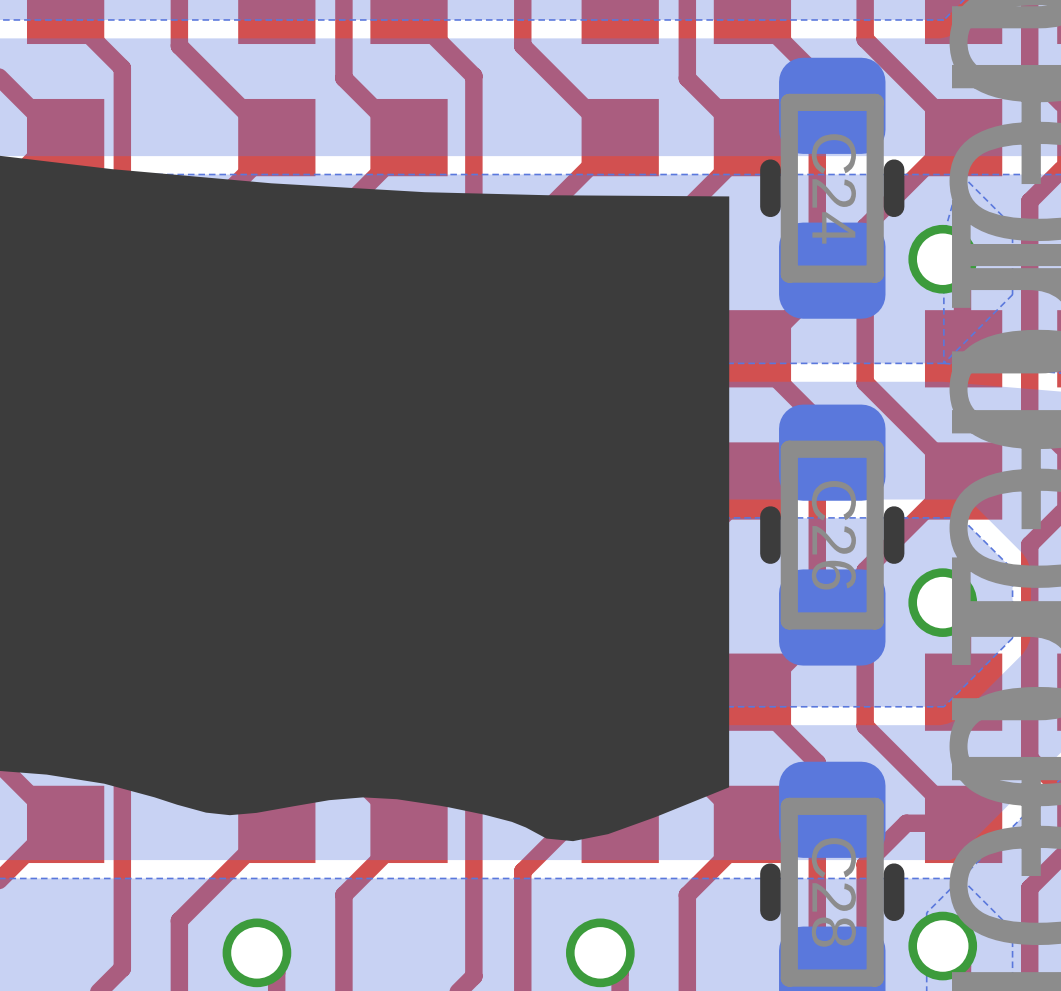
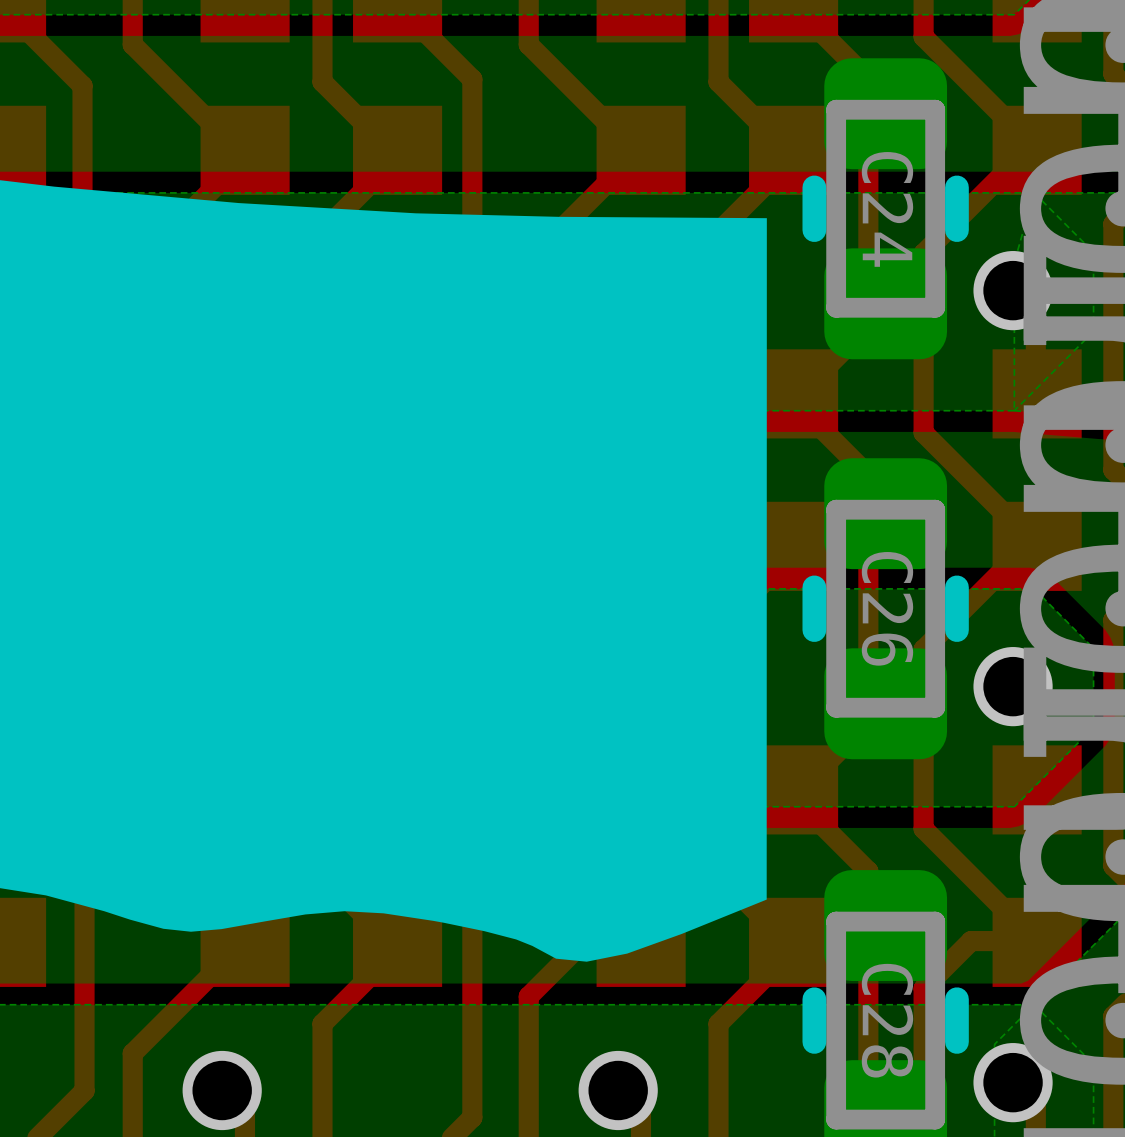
top track: (122, 68) (122, 281) -> (66, 70) (82, 85) (82, 300) (66, 316)
top track: (122, 754) (122, 968) -> (66, 862) (84, 879) (84, 1090) (66, 1108)

